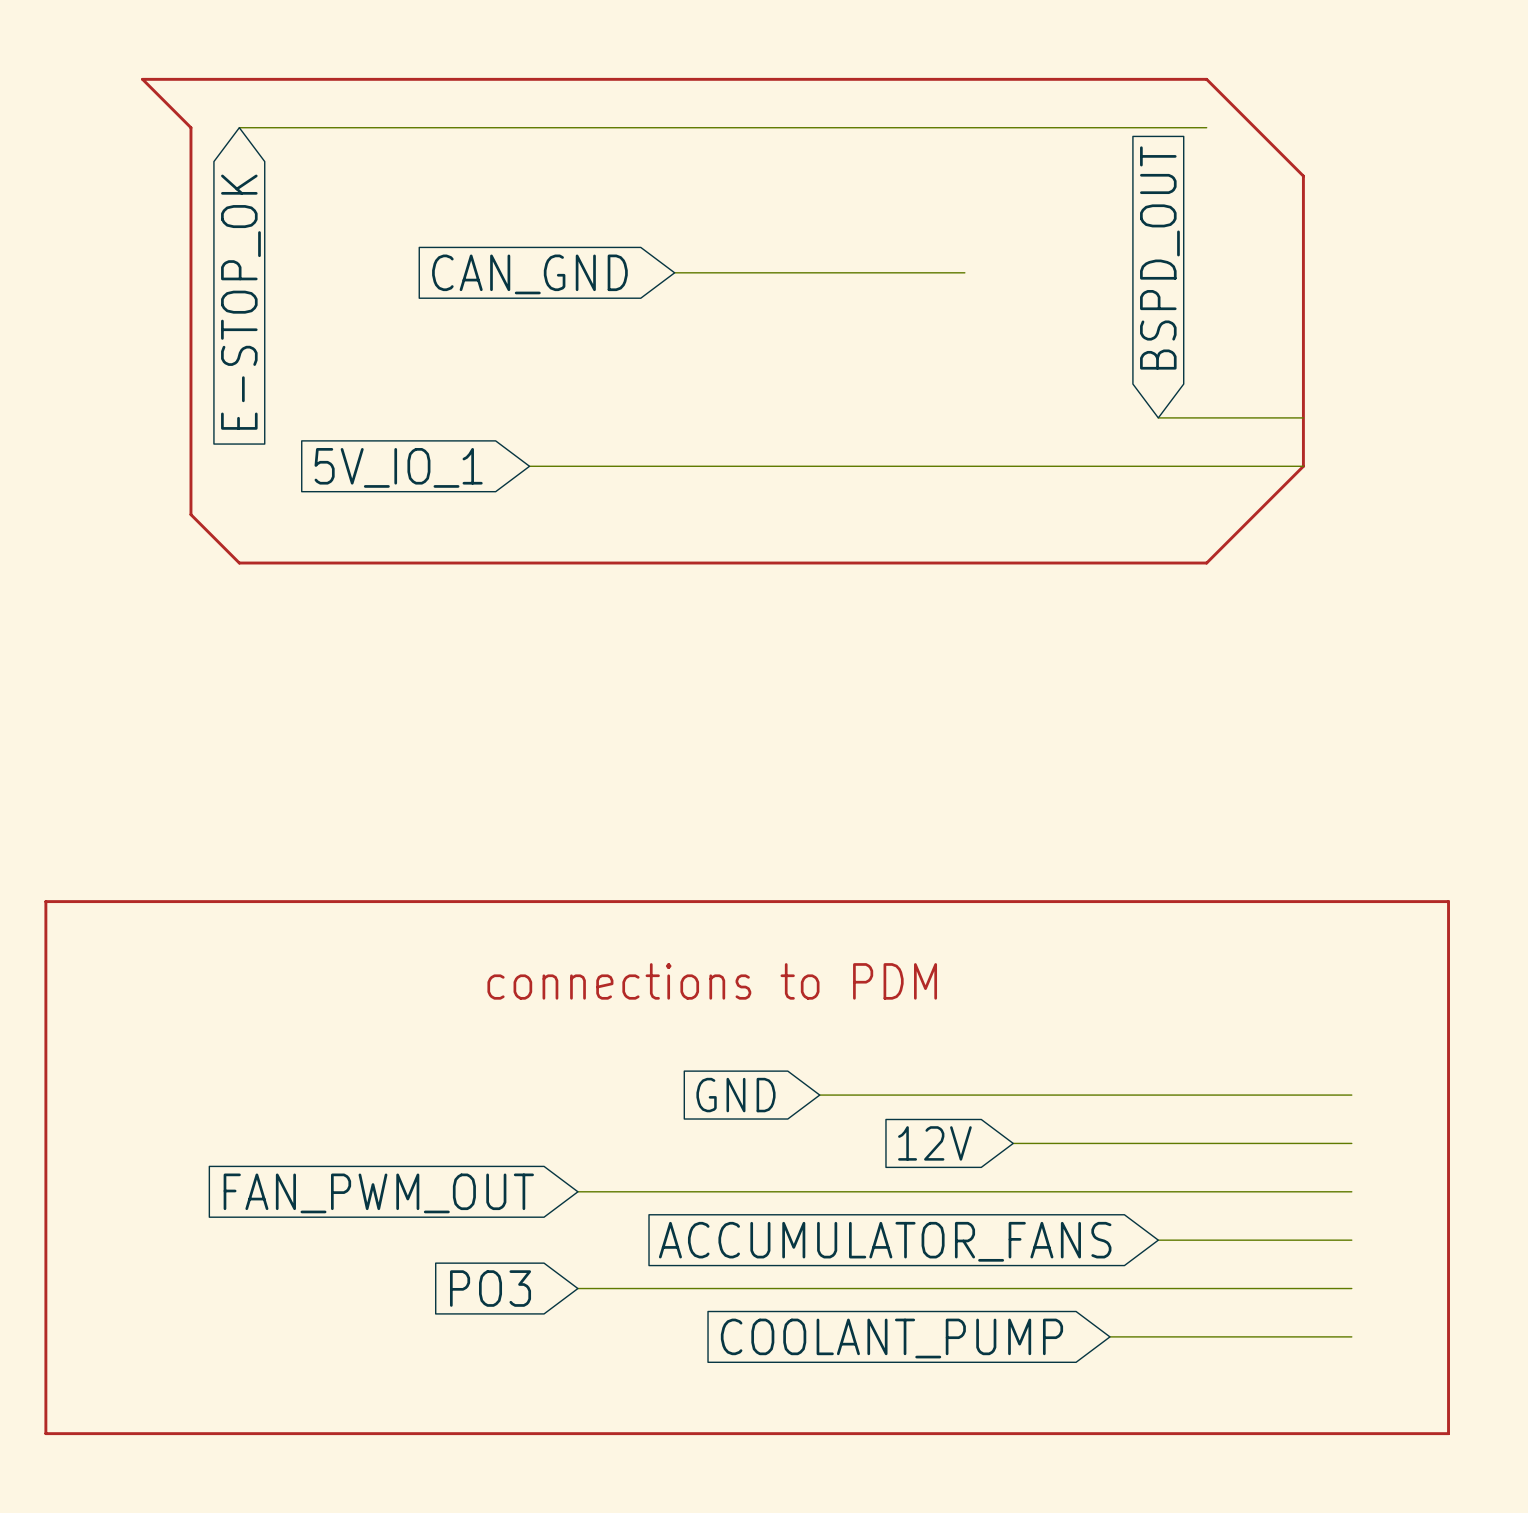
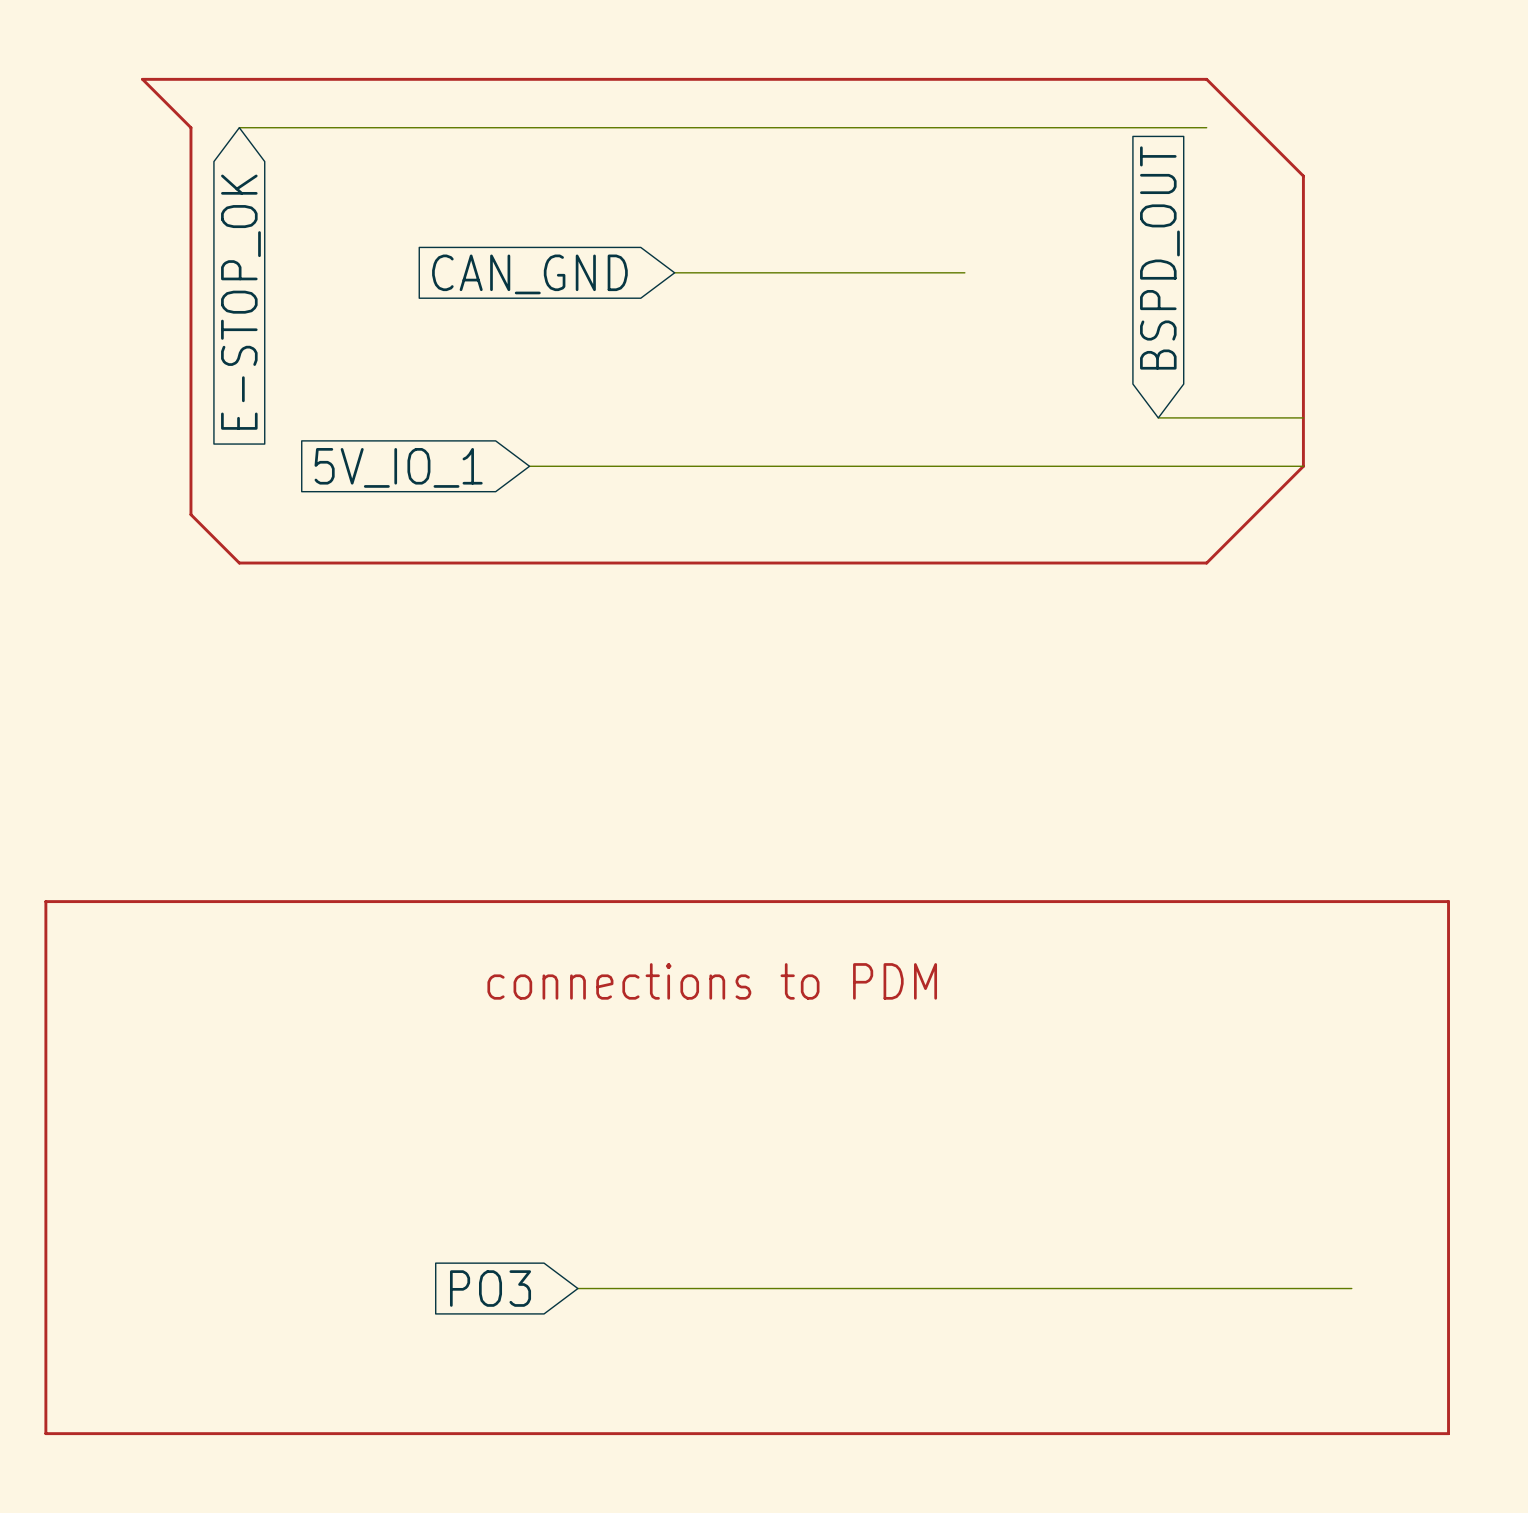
global label: GND (735, 1095) -> none
wire: (819, 1095) (1351, 1095) -> none
global label: 12V (934, 1143) -> none
wire: (1013, 1143) (1351, 1143) -> none
wire: (577, 1191) (1351, 1191) -> none
global label: FAN_PWM_OUT (378, 1193) -> none
wire: (1158, 1240) (1351, 1240) -> none
global label: ACCUMULATOR_FANS (885, 1241) -> none
wire: (1109, 1336) (1351, 1336) -> none
global label: COOLANT_PUMP (891, 1338) -> none

